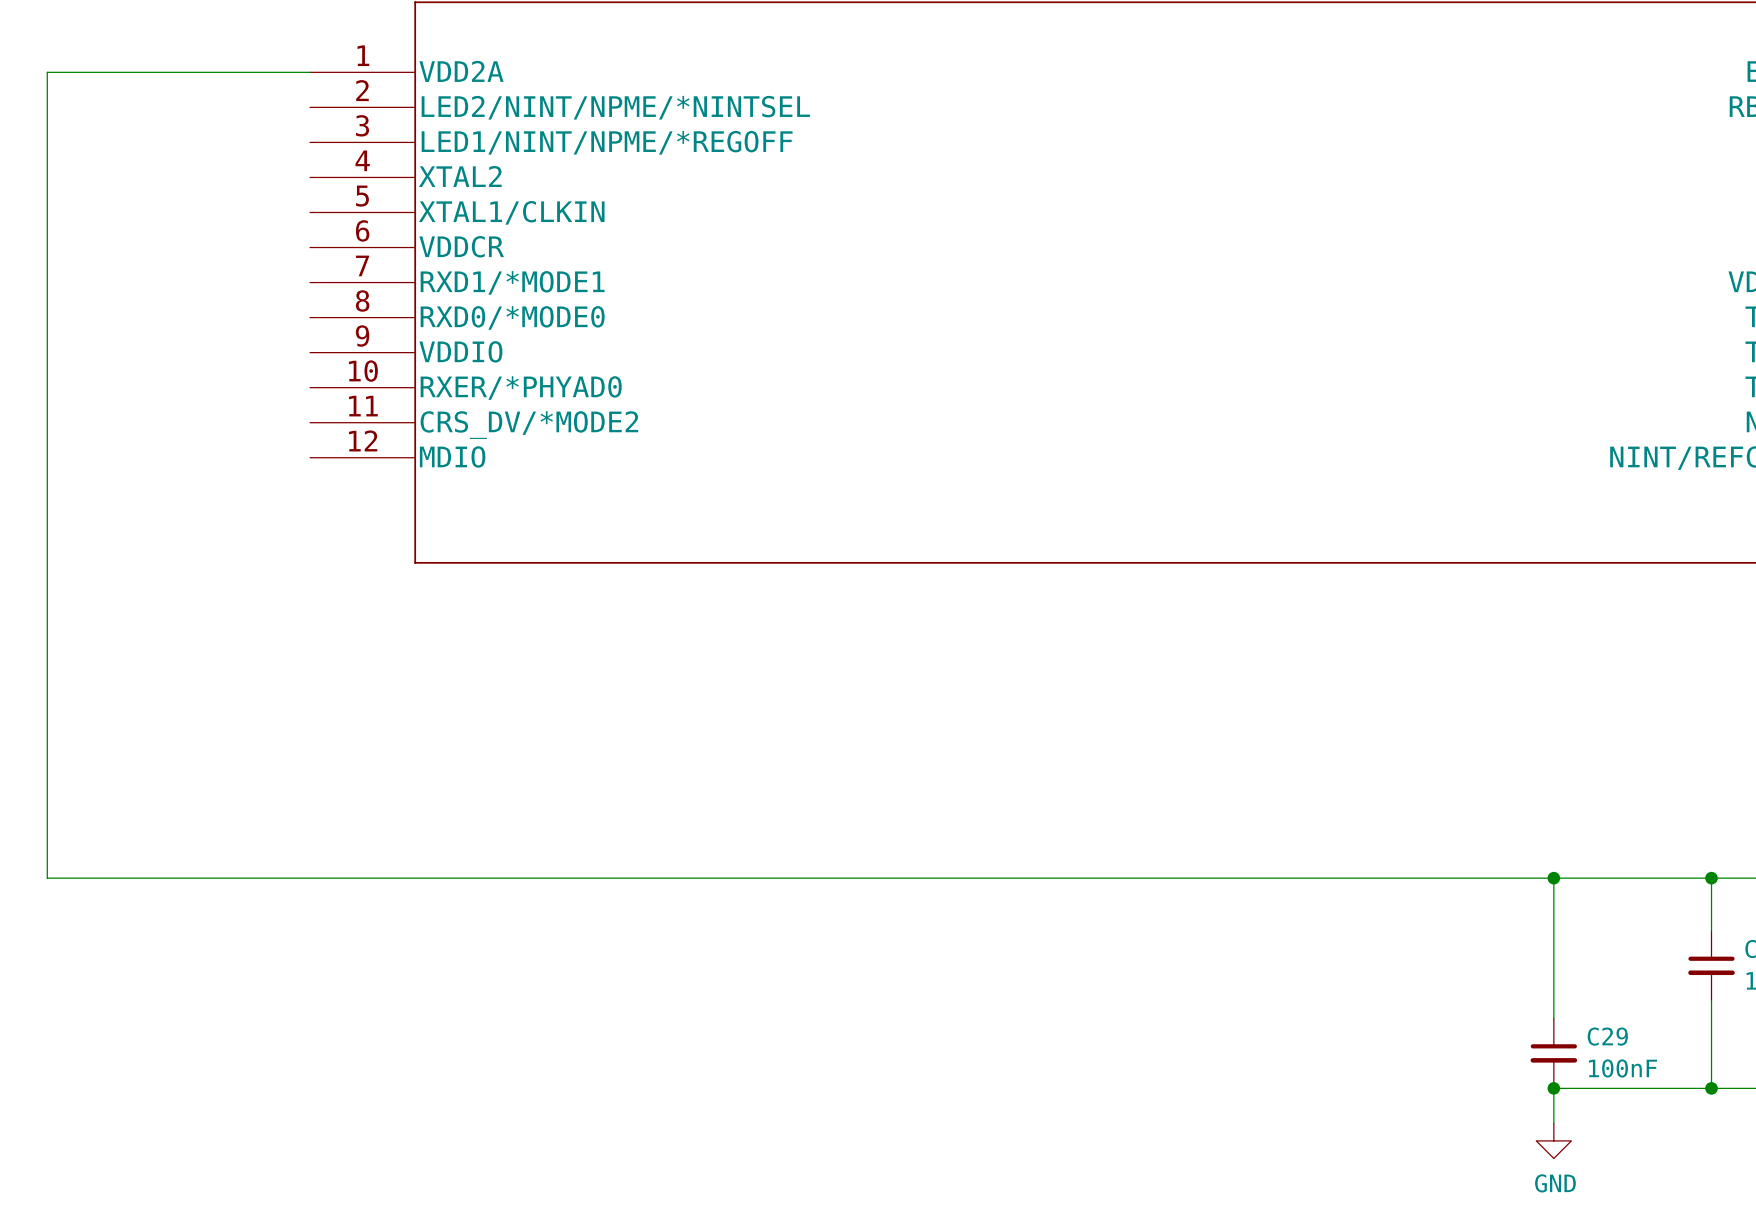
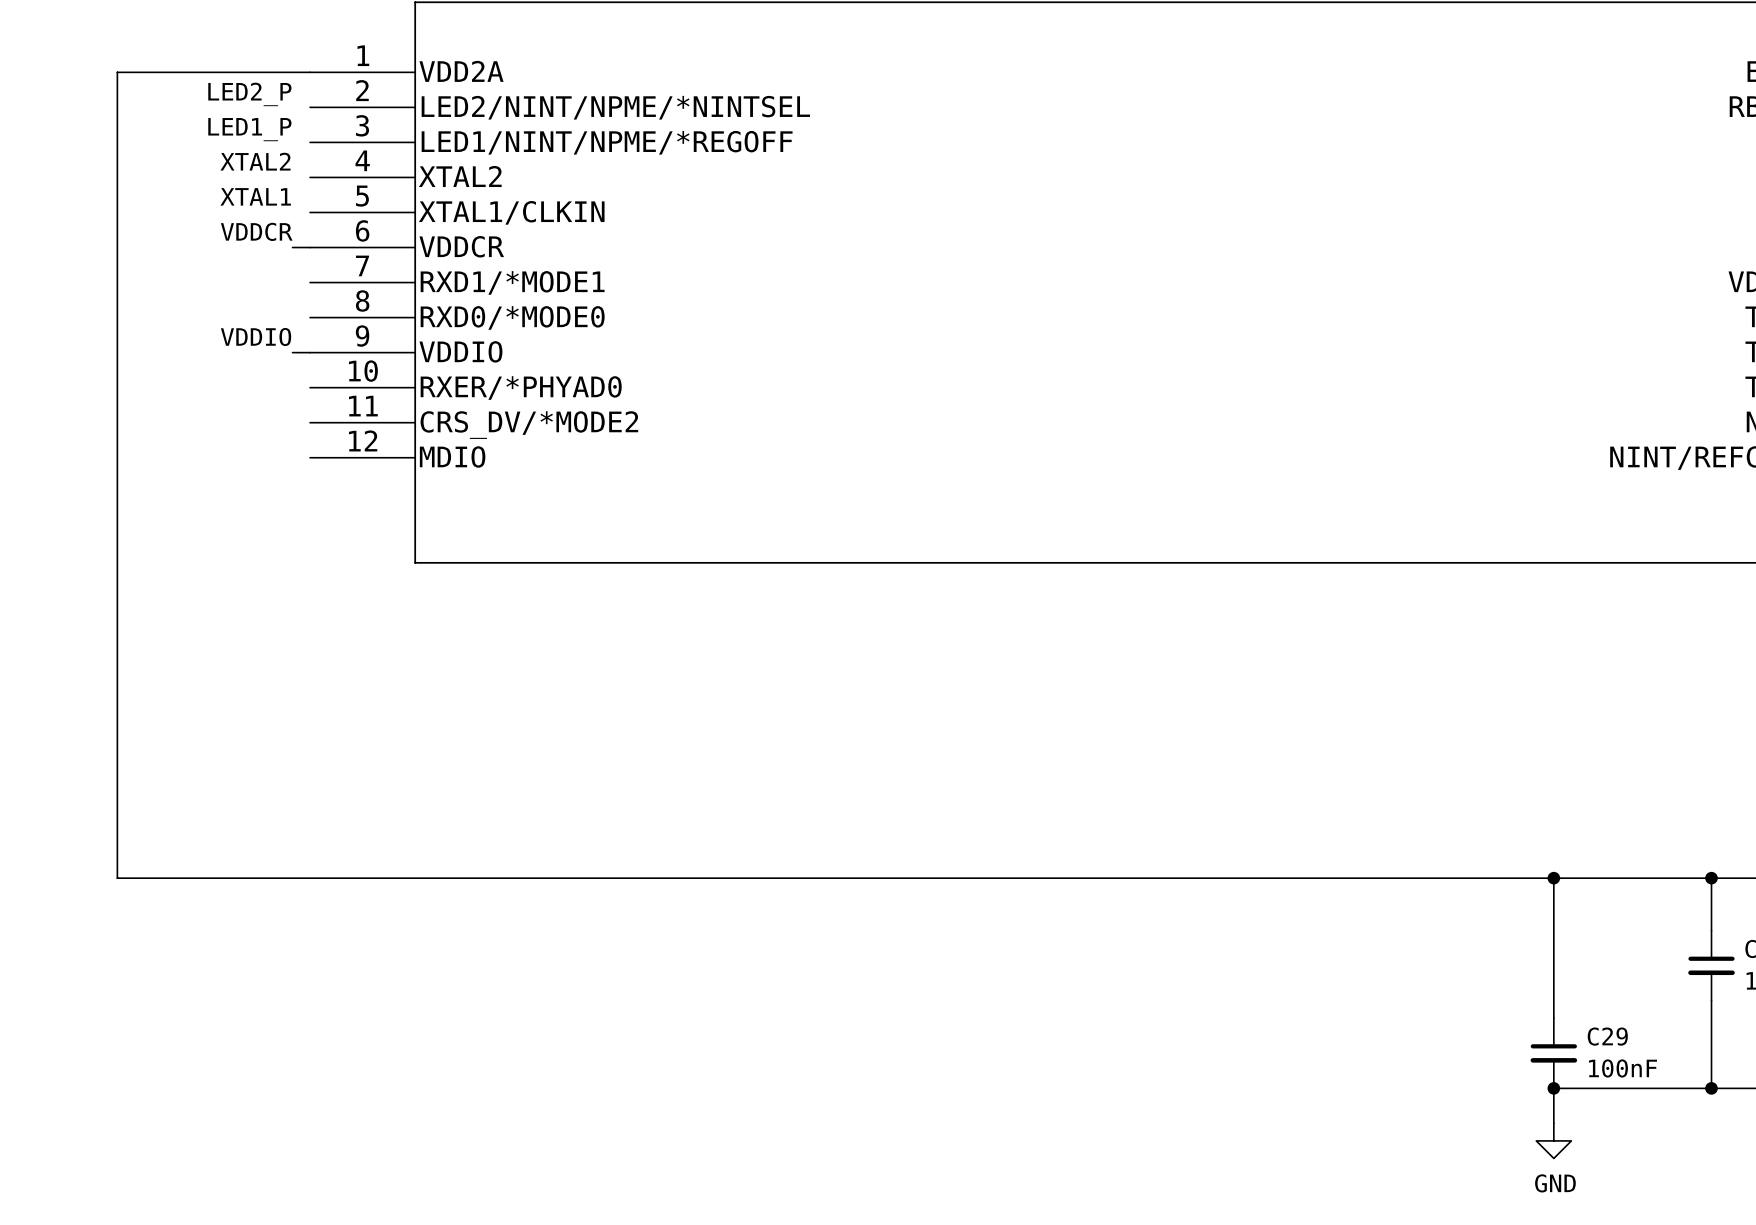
wire: (117, 72) (47, 72) (47, 878) (117, 878) -> (117, 72) (117, 878)
label: none -> LED2_P (249, 94)
label: none -> LED1_P (249, 129)
label: none -> XTAL2 (255, 161)
label: none -> XTAL1 (255, 196)
label: none -> VDDCR (256, 231)
wire: none -> (292, 247) (310, 247)
label: none -> VDDIO (256, 337)
wire: none -> (292, 352) (310, 352)

